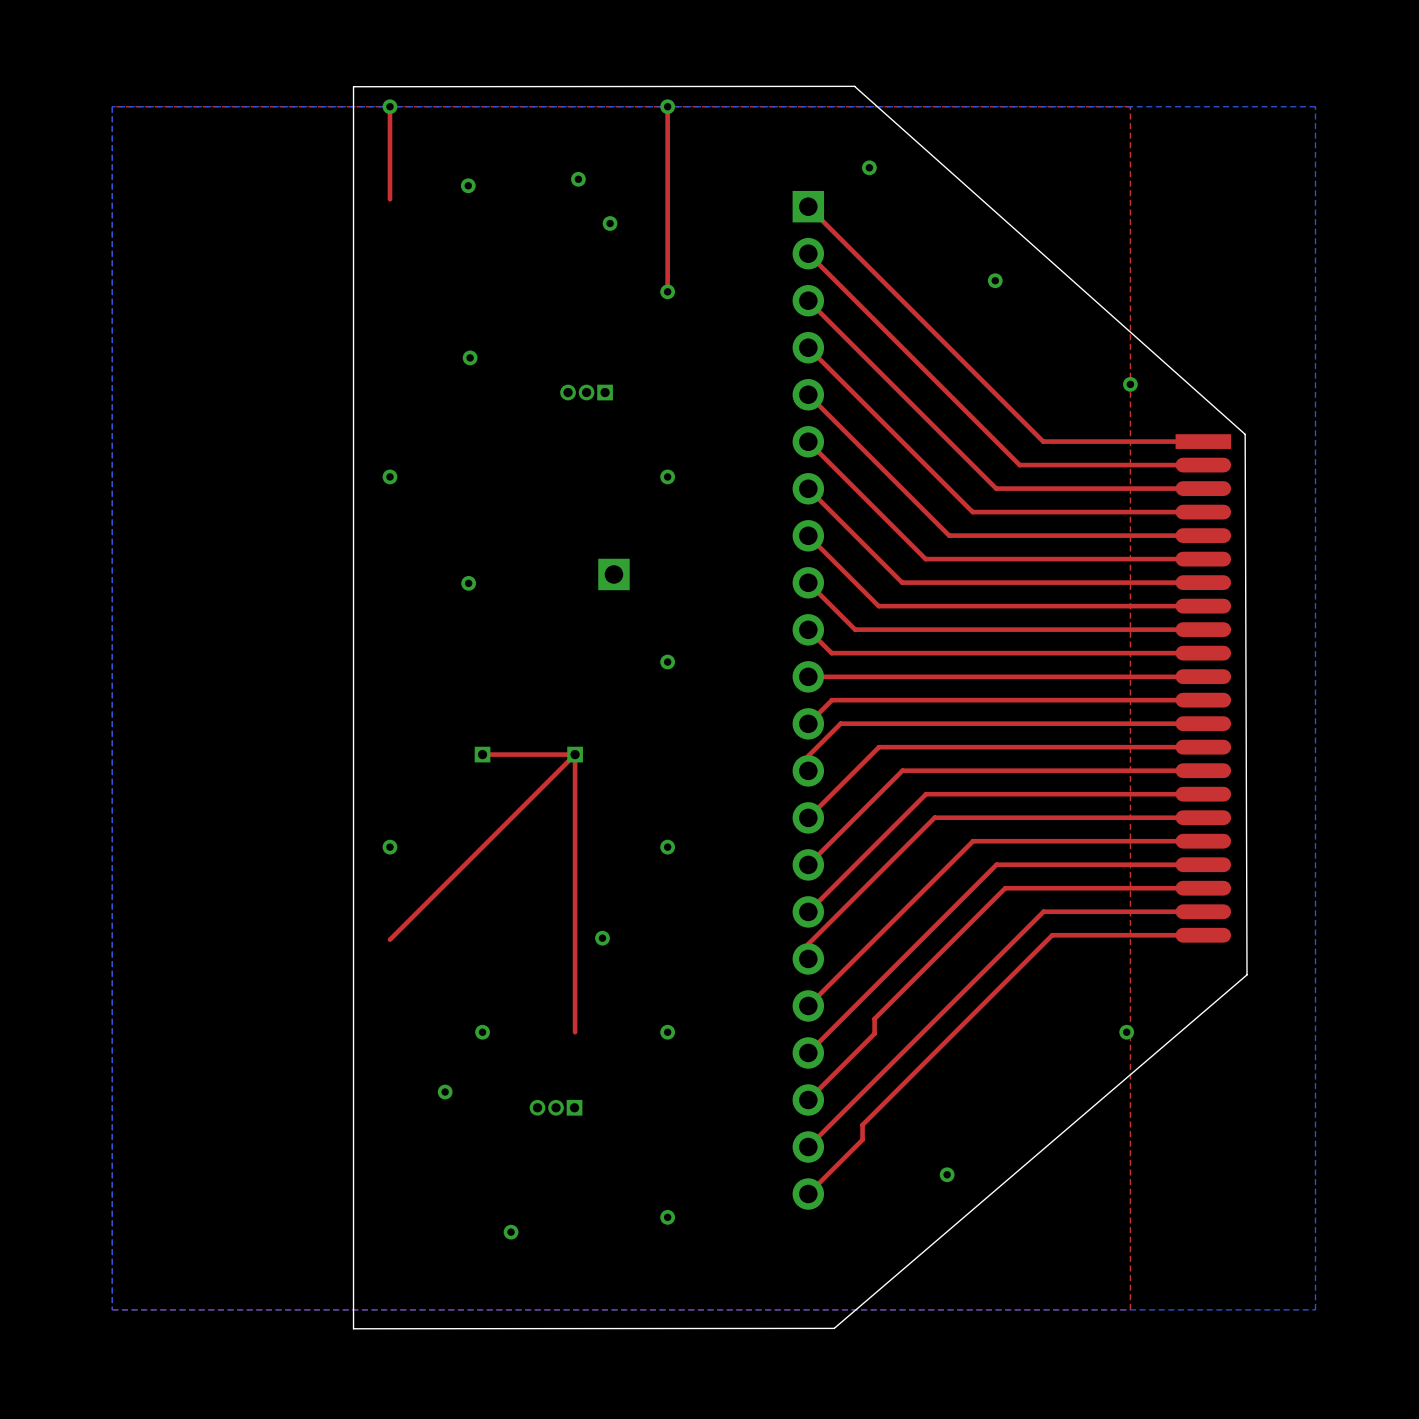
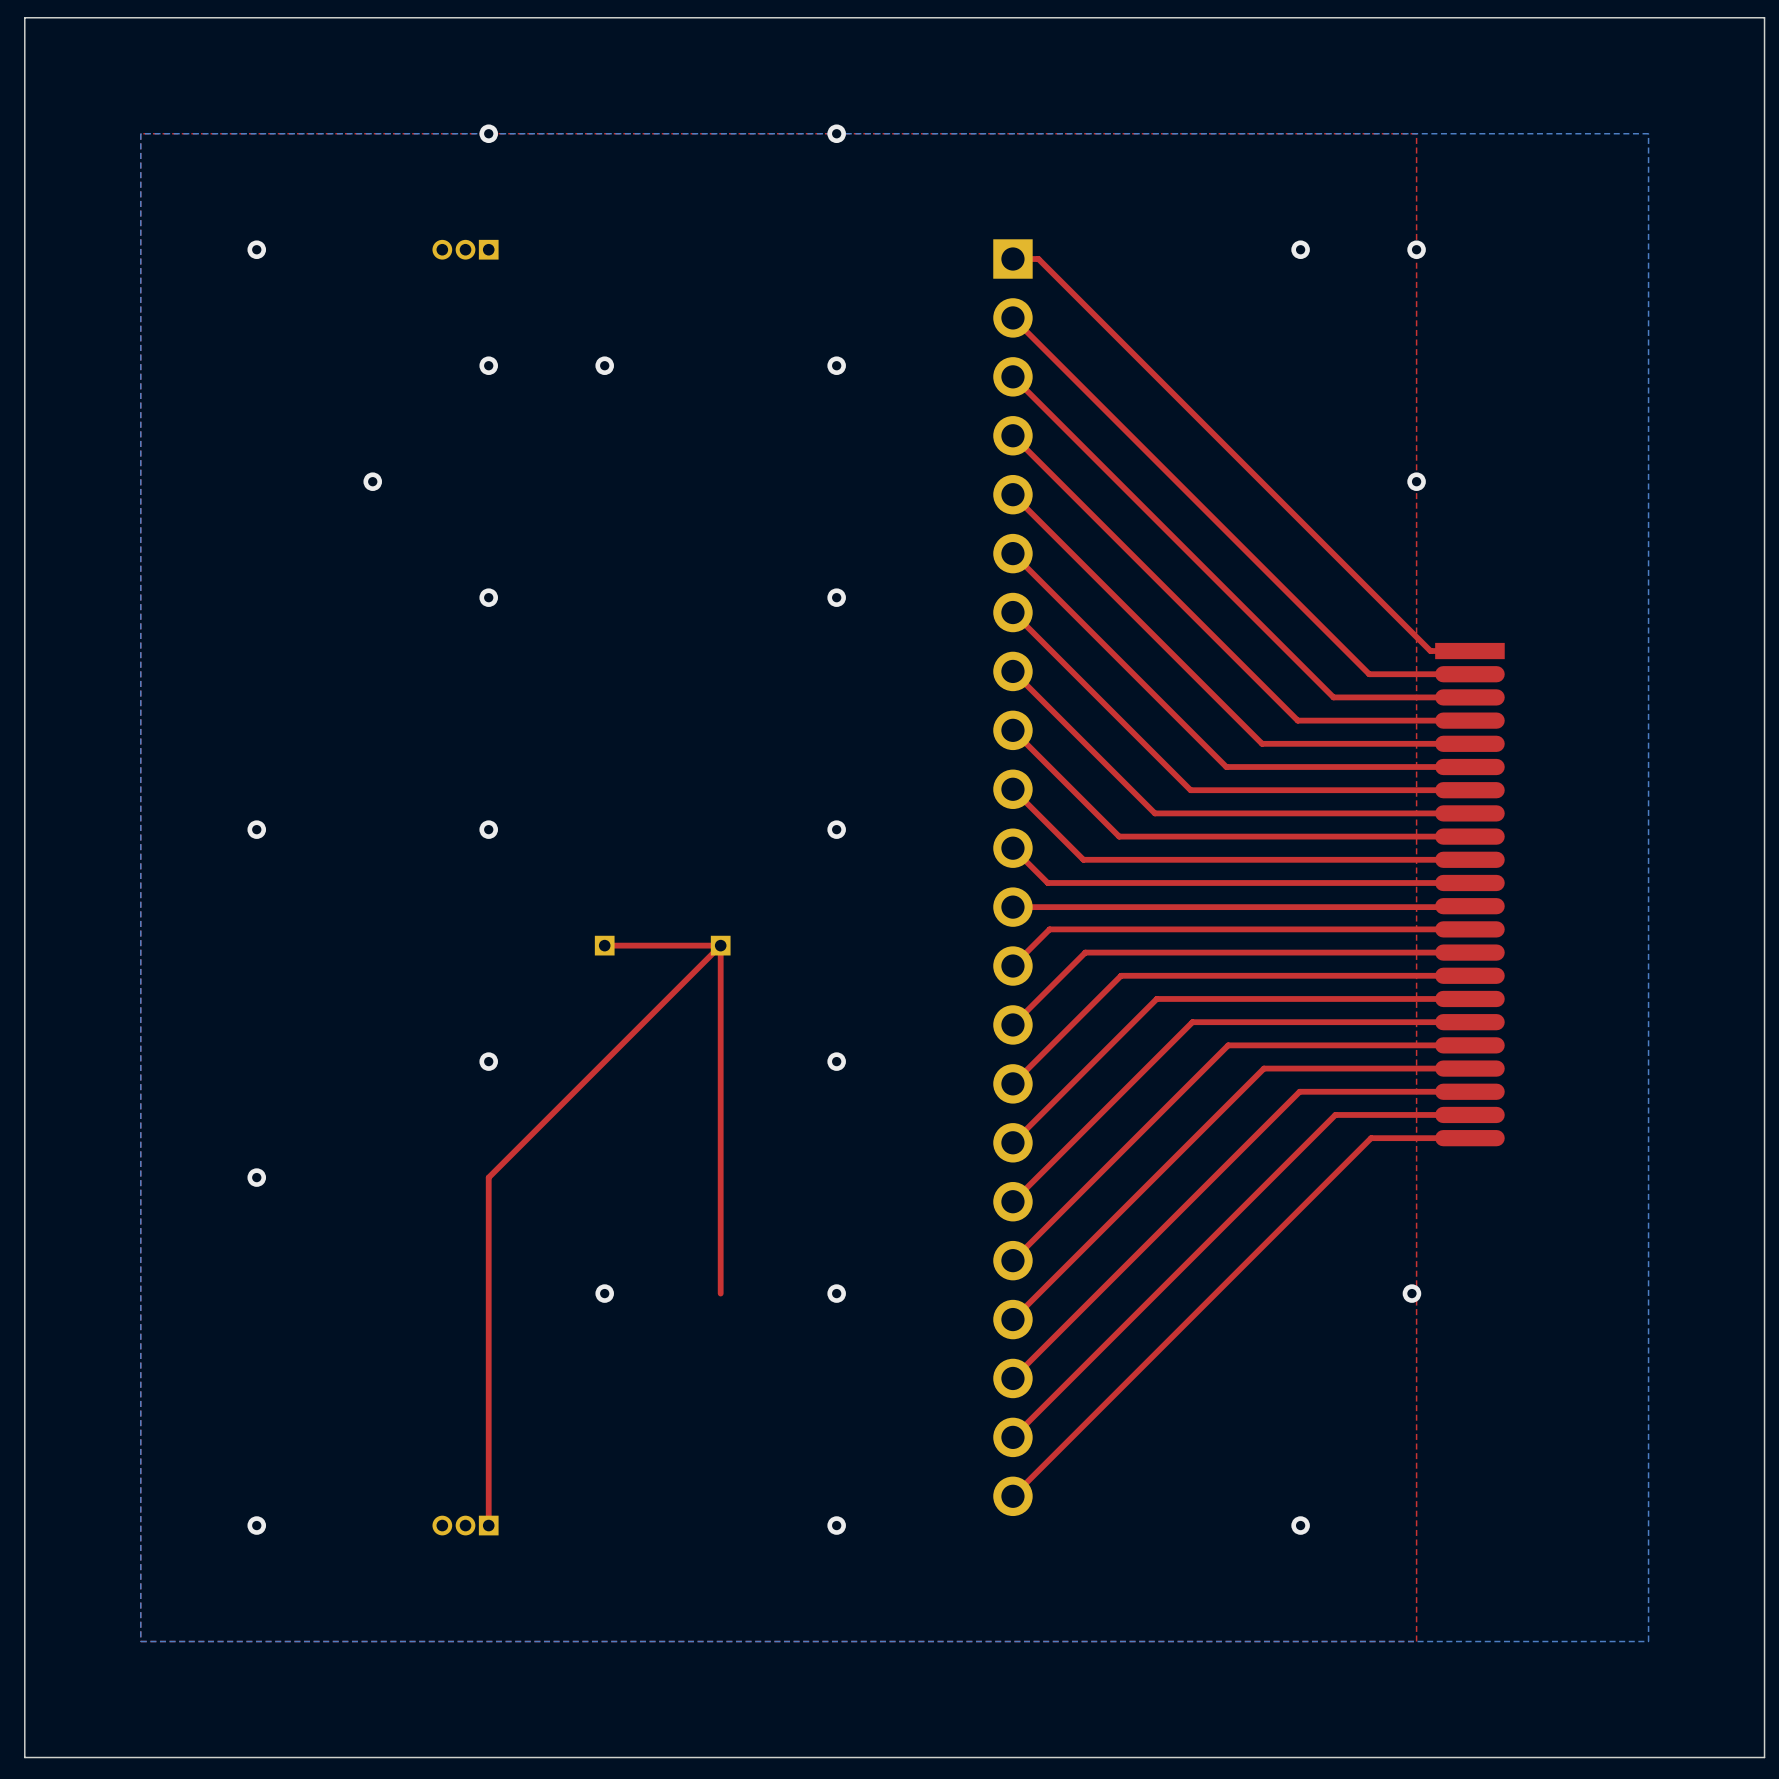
board edge: (854, 86) (353, 86) (353, 1328) (834, 1328) (1247, 974) (1245, 434) (854, 86) -> (1764, 17) (1764, 1757) (24, 1757) (24, 17) (1764, 17)
top track: (389, 106) (389, 199) -> none
top track: (667, 106) (667, 291) -> none
via: (869, 167) -> none
via: (578, 179) -> none
via: (468, 185) -> none
via: none -> (256, 249)
via: none -> (1300, 249)
via: none -> (1416, 249)
top track: (808, 206) (1043, 441) (1203, 441) -> (1012, 259) (1038, 259) (1430, 651) (1469, 651)
via: (610, 223) -> none
via: (995, 280) -> none
via: none -> (488, 365)
via: none -> (604, 365)
via: (470, 357) -> none
via: none -> (372, 481)
part position: (586, 392) -> (465, 249)
top track: (1203, 465) (1019, 465) -> (1469, 674) (1369, 674) (1277, 582)
top track: (1203, 488) (996, 488) -> (1469, 697) (1333, 697) (1248, 612)
top track: (1203, 512) (972, 512) -> (1469, 720) (1297, 720) (1218, 641)
top track: (1203, 535) (949, 535) -> (1469, 743) (1262, 743) (1189, 671)
top track: (1203, 559) (925, 559) -> (1469, 767) (1226, 767) (1160, 700)
part: (613, 574) -> none
top track: (1203, 582) (902, 582) -> (1469, 790) (1190, 790) (1130, 730)
via: (468, 583) -> none
top track: (1203, 606) (878, 606) -> (1469, 813) (1154, 813) (1101, 759)
top track: (1203, 629) (855, 629) -> (1469, 836) (1119, 836) (1071, 789)
top track: (1203, 653) (831, 653) -> (1469, 859) (1083, 859) (1042, 818)
via: none -> (256, 829)
via: none -> (488, 829)
top track: (1203, 676) (808, 676) -> (1469, 882) (1047, 882) (1012, 848)
part: (1203, 688) -> none
top track: (1203, 700) (832, 700) (808, 723) -> (1469, 906) (1012, 907)
part: none -> (1469, 894)
top track: (1203, 723) (840, 723) (808, 756) (808, 770) -> (1469, 929) (1049, 929) (1012, 966)
top track: (1203, 747) (879, 747) (866, 760) -> (1469, 952) (1085, 952)
top track: (1203, 770) (902, 770) (894, 778) -> (1469, 975) (1121, 975)
top track: (1203, 794) (926, 794) (923, 797) -> (1469, 998) (1156, 998)
top track: (1203, 817) (934, 817) (808, 944) (808, 958) -> (1469, 1022) (1192, 1022) (1012, 1201)
top track: (1203, 841) (973, 841) -> (1469, 1045) (1228, 1045) (1219, 1054)
top track: (1203, 864) (996, 864) -> (1469, 1068) (1263, 1068) (1248, 1083)
top track: (1203, 888) (1005, 888) (874, 1018) (874, 1033) -> (1469, 1091) (1299, 1091) (1096, 1295)
top track: (1203, 911) (1043, 911) -> (1469, 1114) (1335, 1114) (1307, 1142)
top track: (1203, 935) (1052, 935) (862, 1124) (862, 1139) -> (1469, 1138) (1371, 1138) (1080, 1428)
via: (602, 938) -> none
via: none -> (256, 1177)
top track: none -> (488, 1177) (488, 1525)
via: (445, 1092) -> none
part position: (556, 1107) -> (465, 1525)
via position: (947, 1174) -> (1300, 1525)
via: none -> (256, 1525)
via: (511, 1232) -> none

